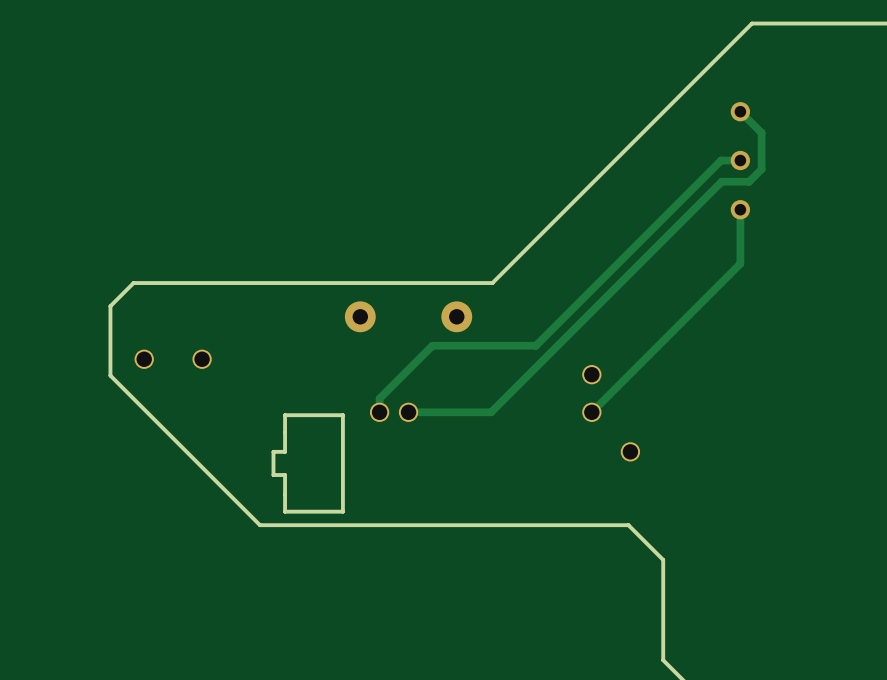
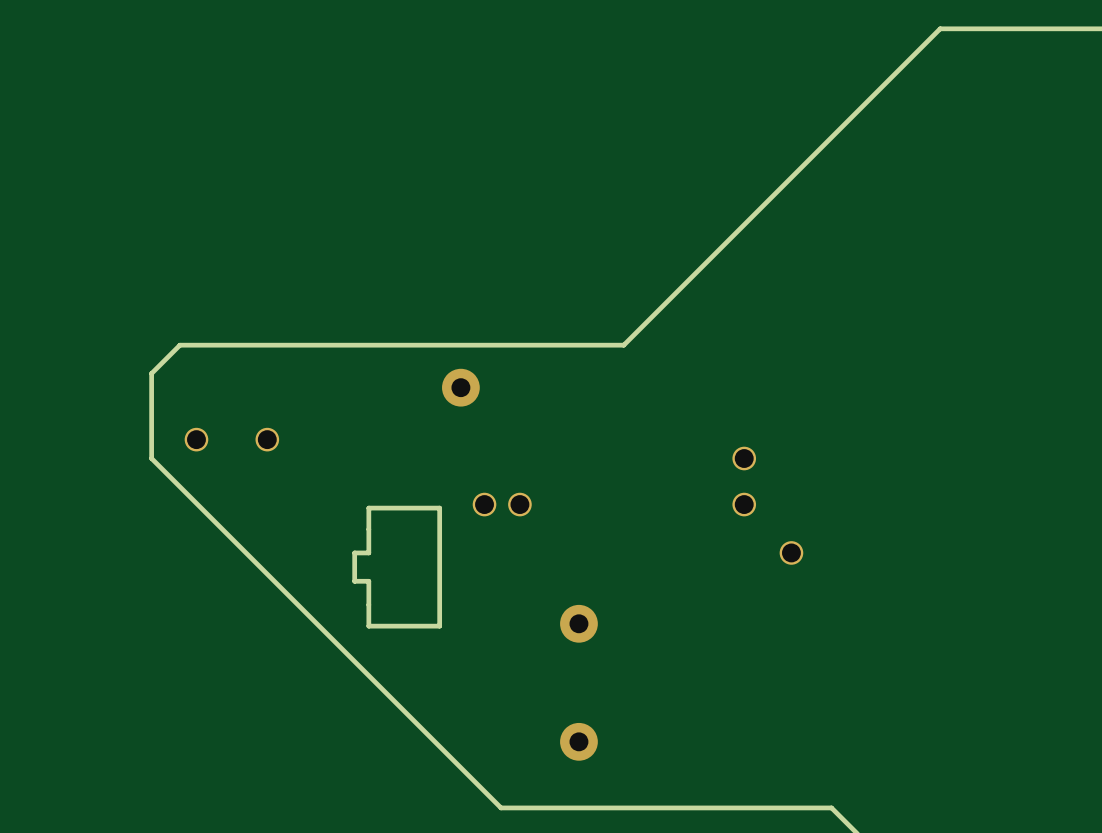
track: (740, 111) (761, 132) (761, 169) (749, 181) (721, 181) (491, 412) (408, 412) -> none
via: (740, 111) -> none
track: (740, 160) (721, 160) (535, 345) (432, 345) (379, 398) (379, 412) -> none
via: (740, 160) -> none
track: (740, 209) (740, 263) (591, 412) -> none
via: (740, 209) -> none
board edge: (493, 282) (133, 283) (110, 306) (110, 375) (259, 525) (628, 525) (663, 559) (663, 660) -> (623, 345) (179, 345) (151, 373) (151, 458) (501, 807) (831, 807)
via: (456, 316) -> none
via: none -> (578, 623)
via: none -> (578, 741)

